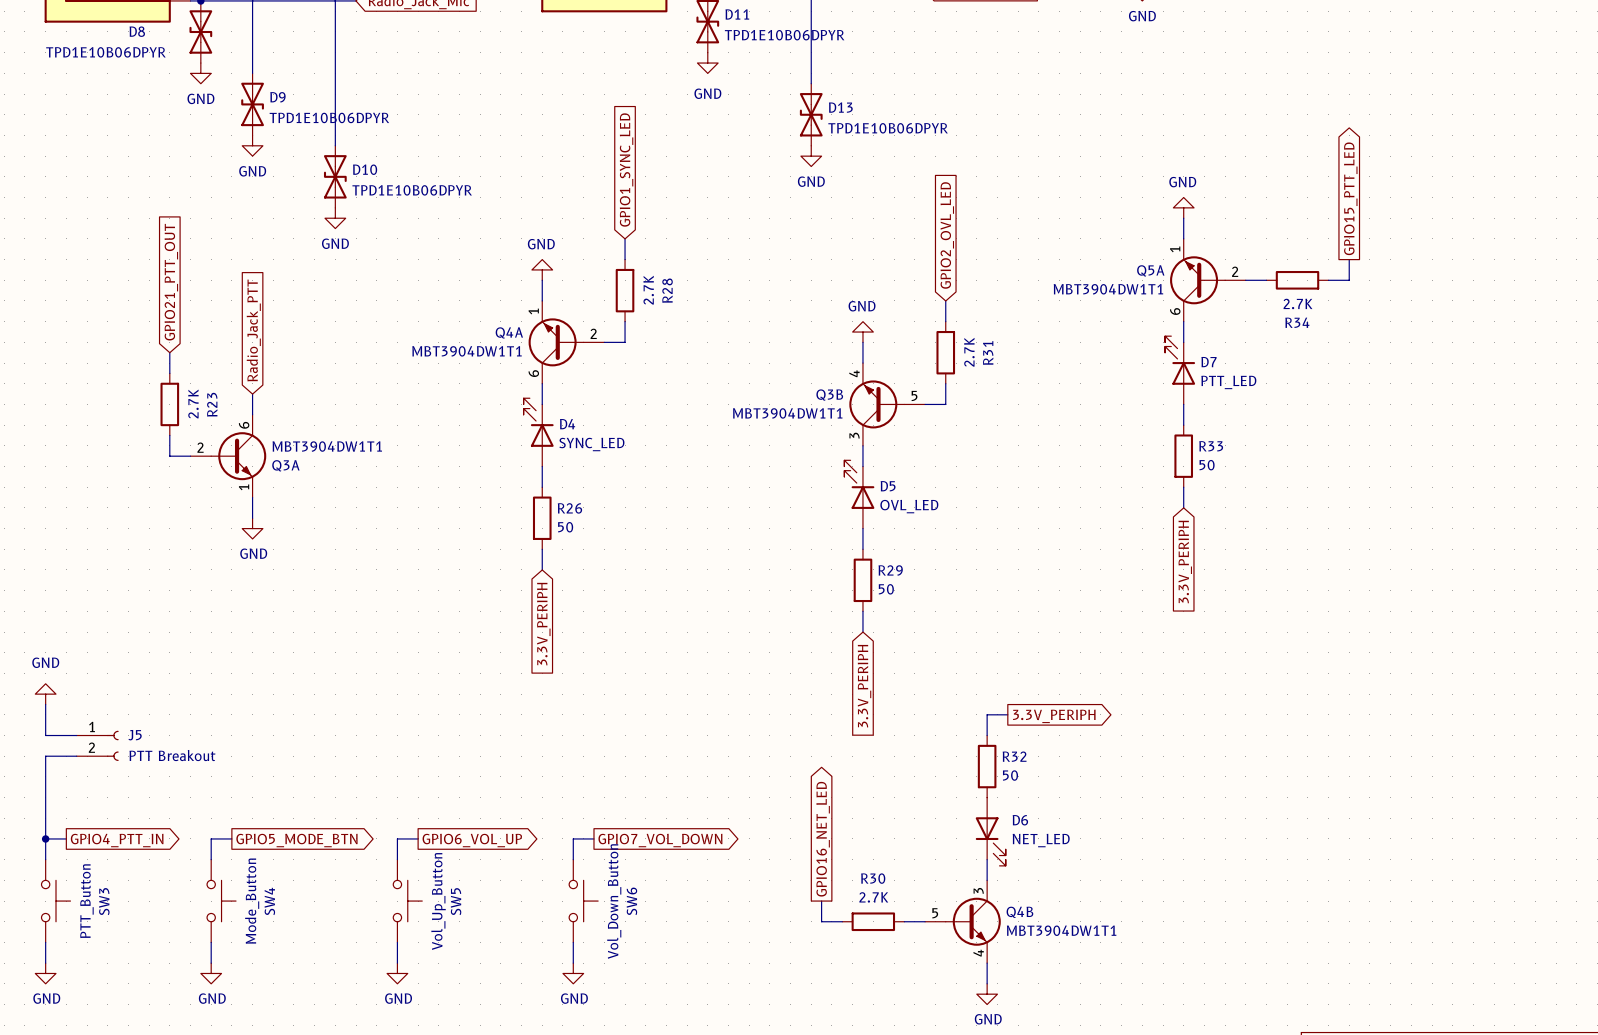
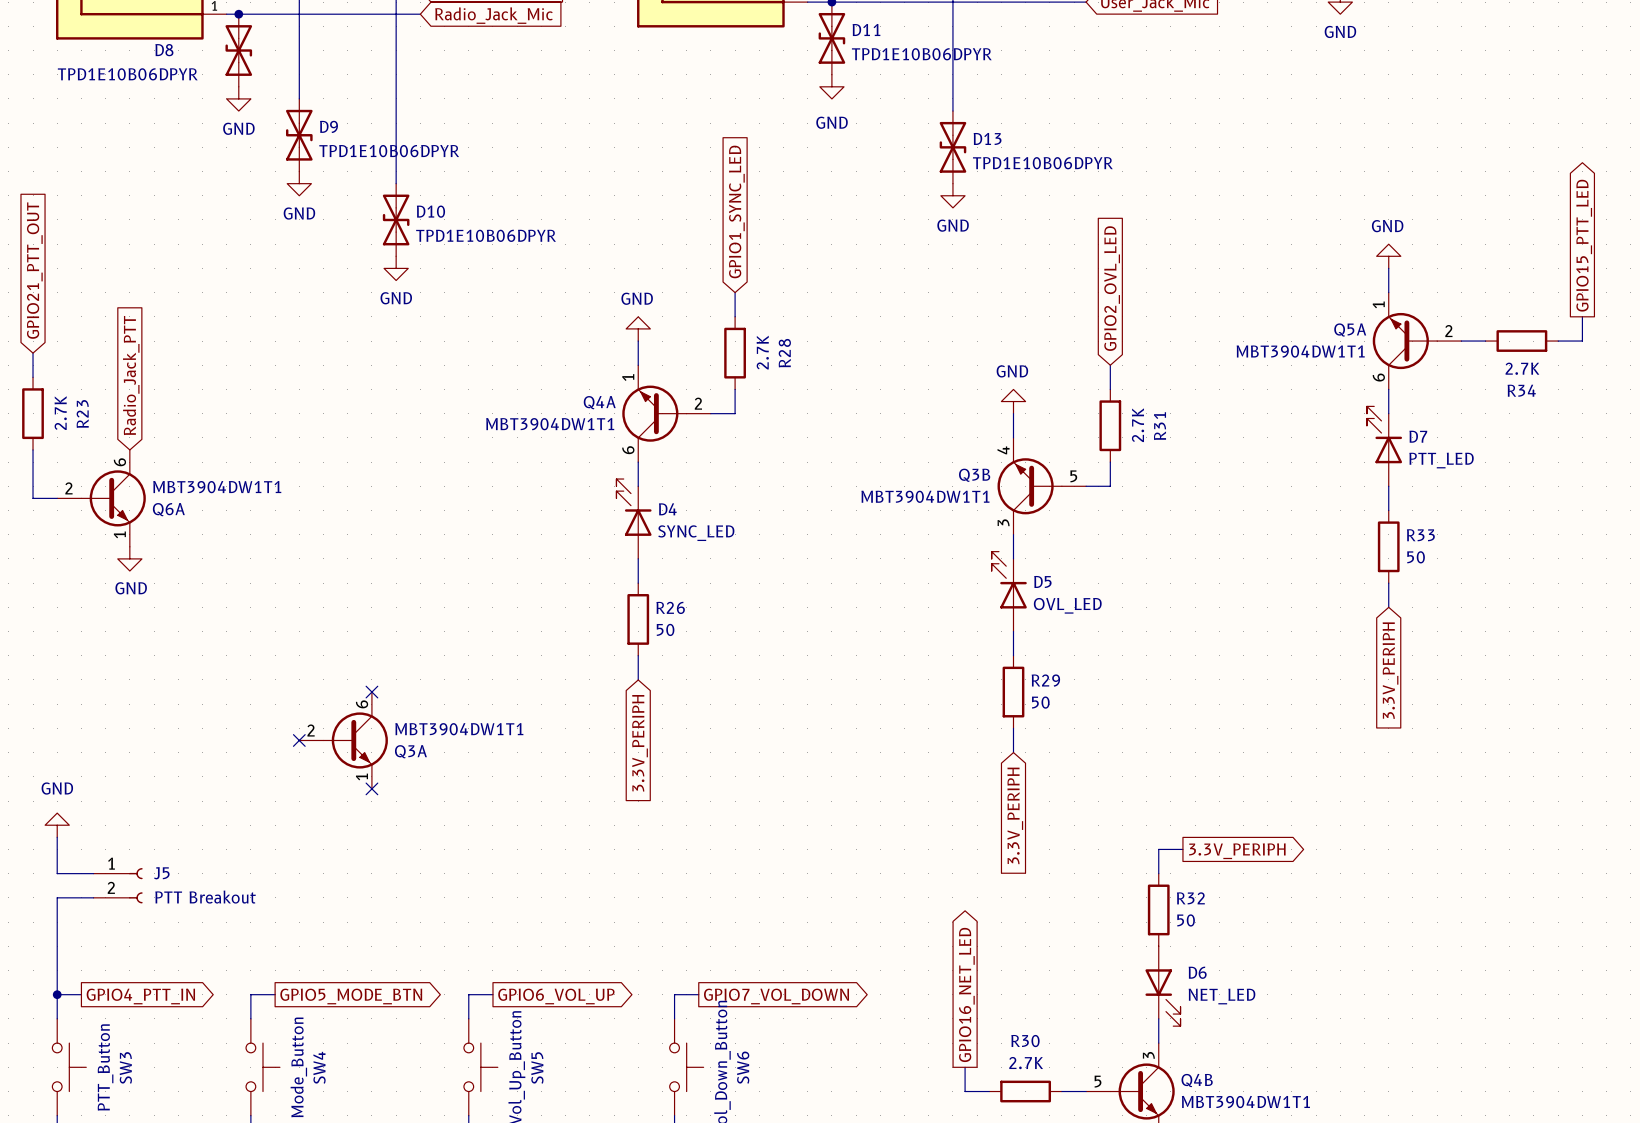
global label position: GPIO21_PTT_OUT (171, 282) -> GPIO21_PTT_OUT (34, 270)
global label position: Radio_Jack_PTT (253, 330) -> Radio_Jack_PTT (131, 375)
wire: (169, 352) (169, 373) -> (33, 353) (33, 377)
wire: none -> (33, 449) (33, 498) (57, 498)
wire: (252, 394) (252, 414) -> none
R23 position: (169, 404) -> (33, 413)
Q6A: none -> MBT3904DW1T1 (101, 498)
wire: (169, 435) (169, 456) (190, 456) -> none
Q3A position: (228, 456) -> (343, 740)
wire: (252, 497) (252, 518) -> none
power symbol position: GND (252, 528) -> GND (129, 558)
no-connect mark: none -> (371, 692)
no-connect mark: none -> (299, 740)
no-connect mark: none -> (371, 788)

